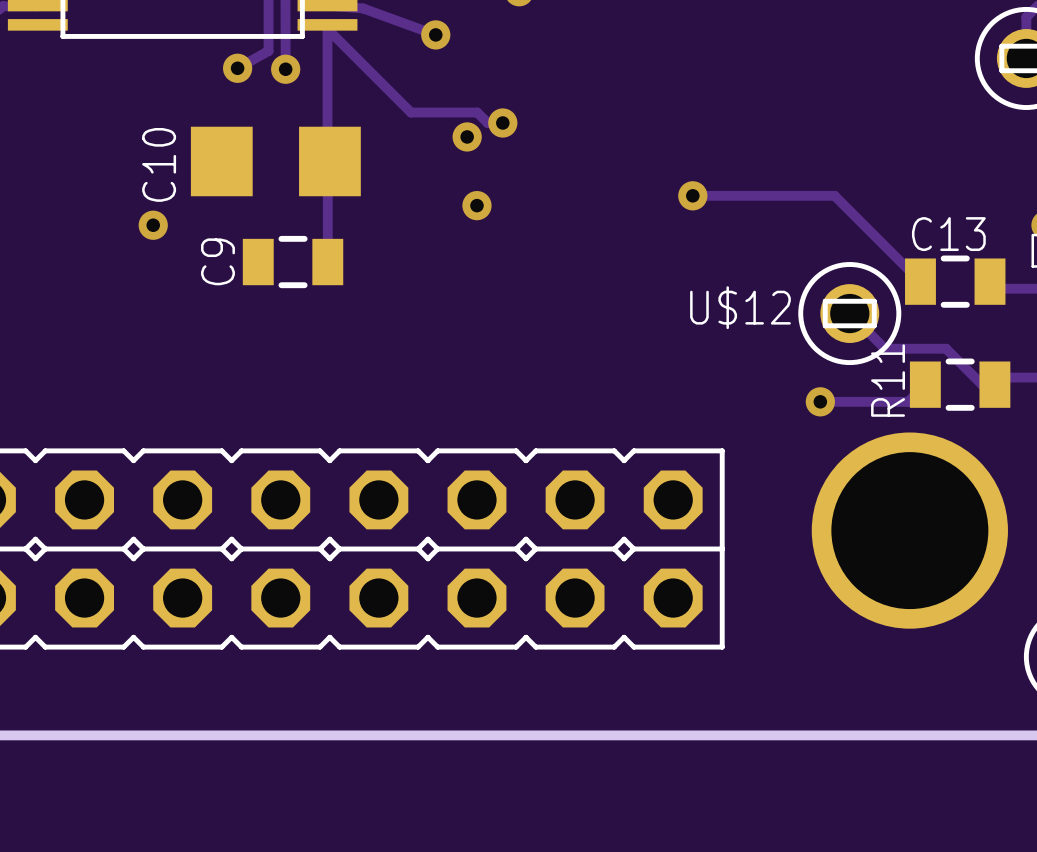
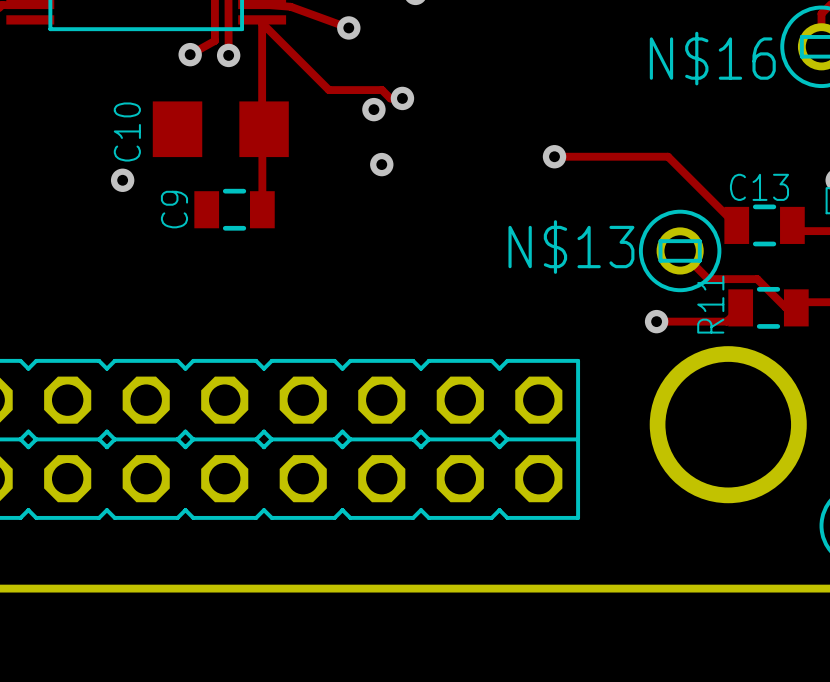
text: none -> N$16 (712, 58)
U$12 name: U$12 (740, 307) -> none
text: none -> N$13 (571, 247)

